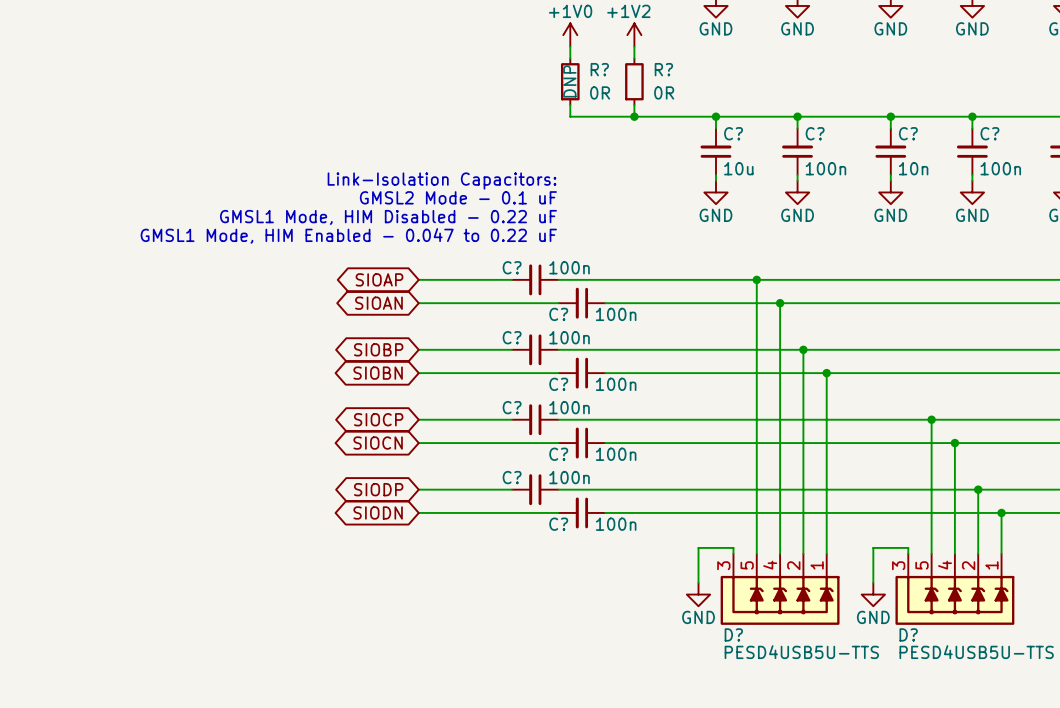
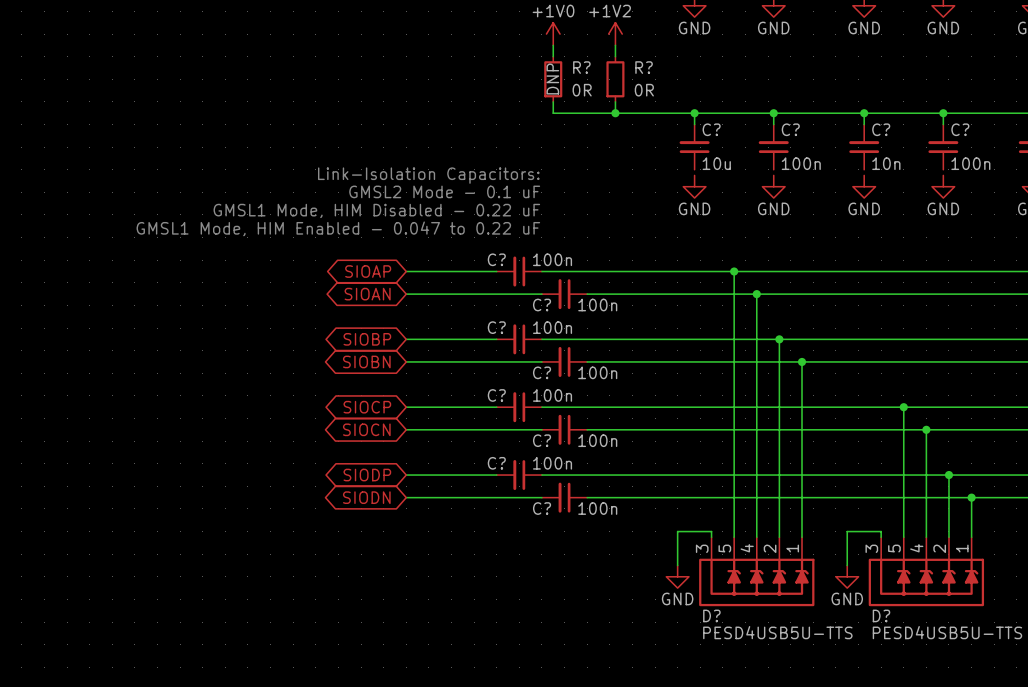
wire: (715, 174) (715, 180) -> none
wire: (797, 174) (797, 180) -> none
wire: (890, 174) (890, 180) -> none
wire: (972, 174) (972, 180) -> none

